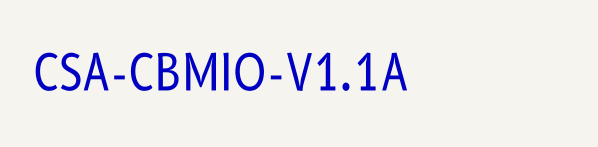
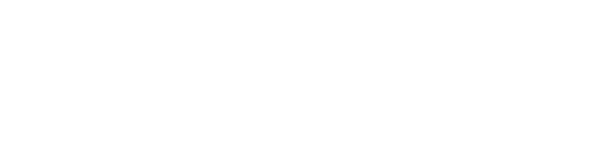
text: CSA-CBMIO-V1.1A (221, 71) -> none

